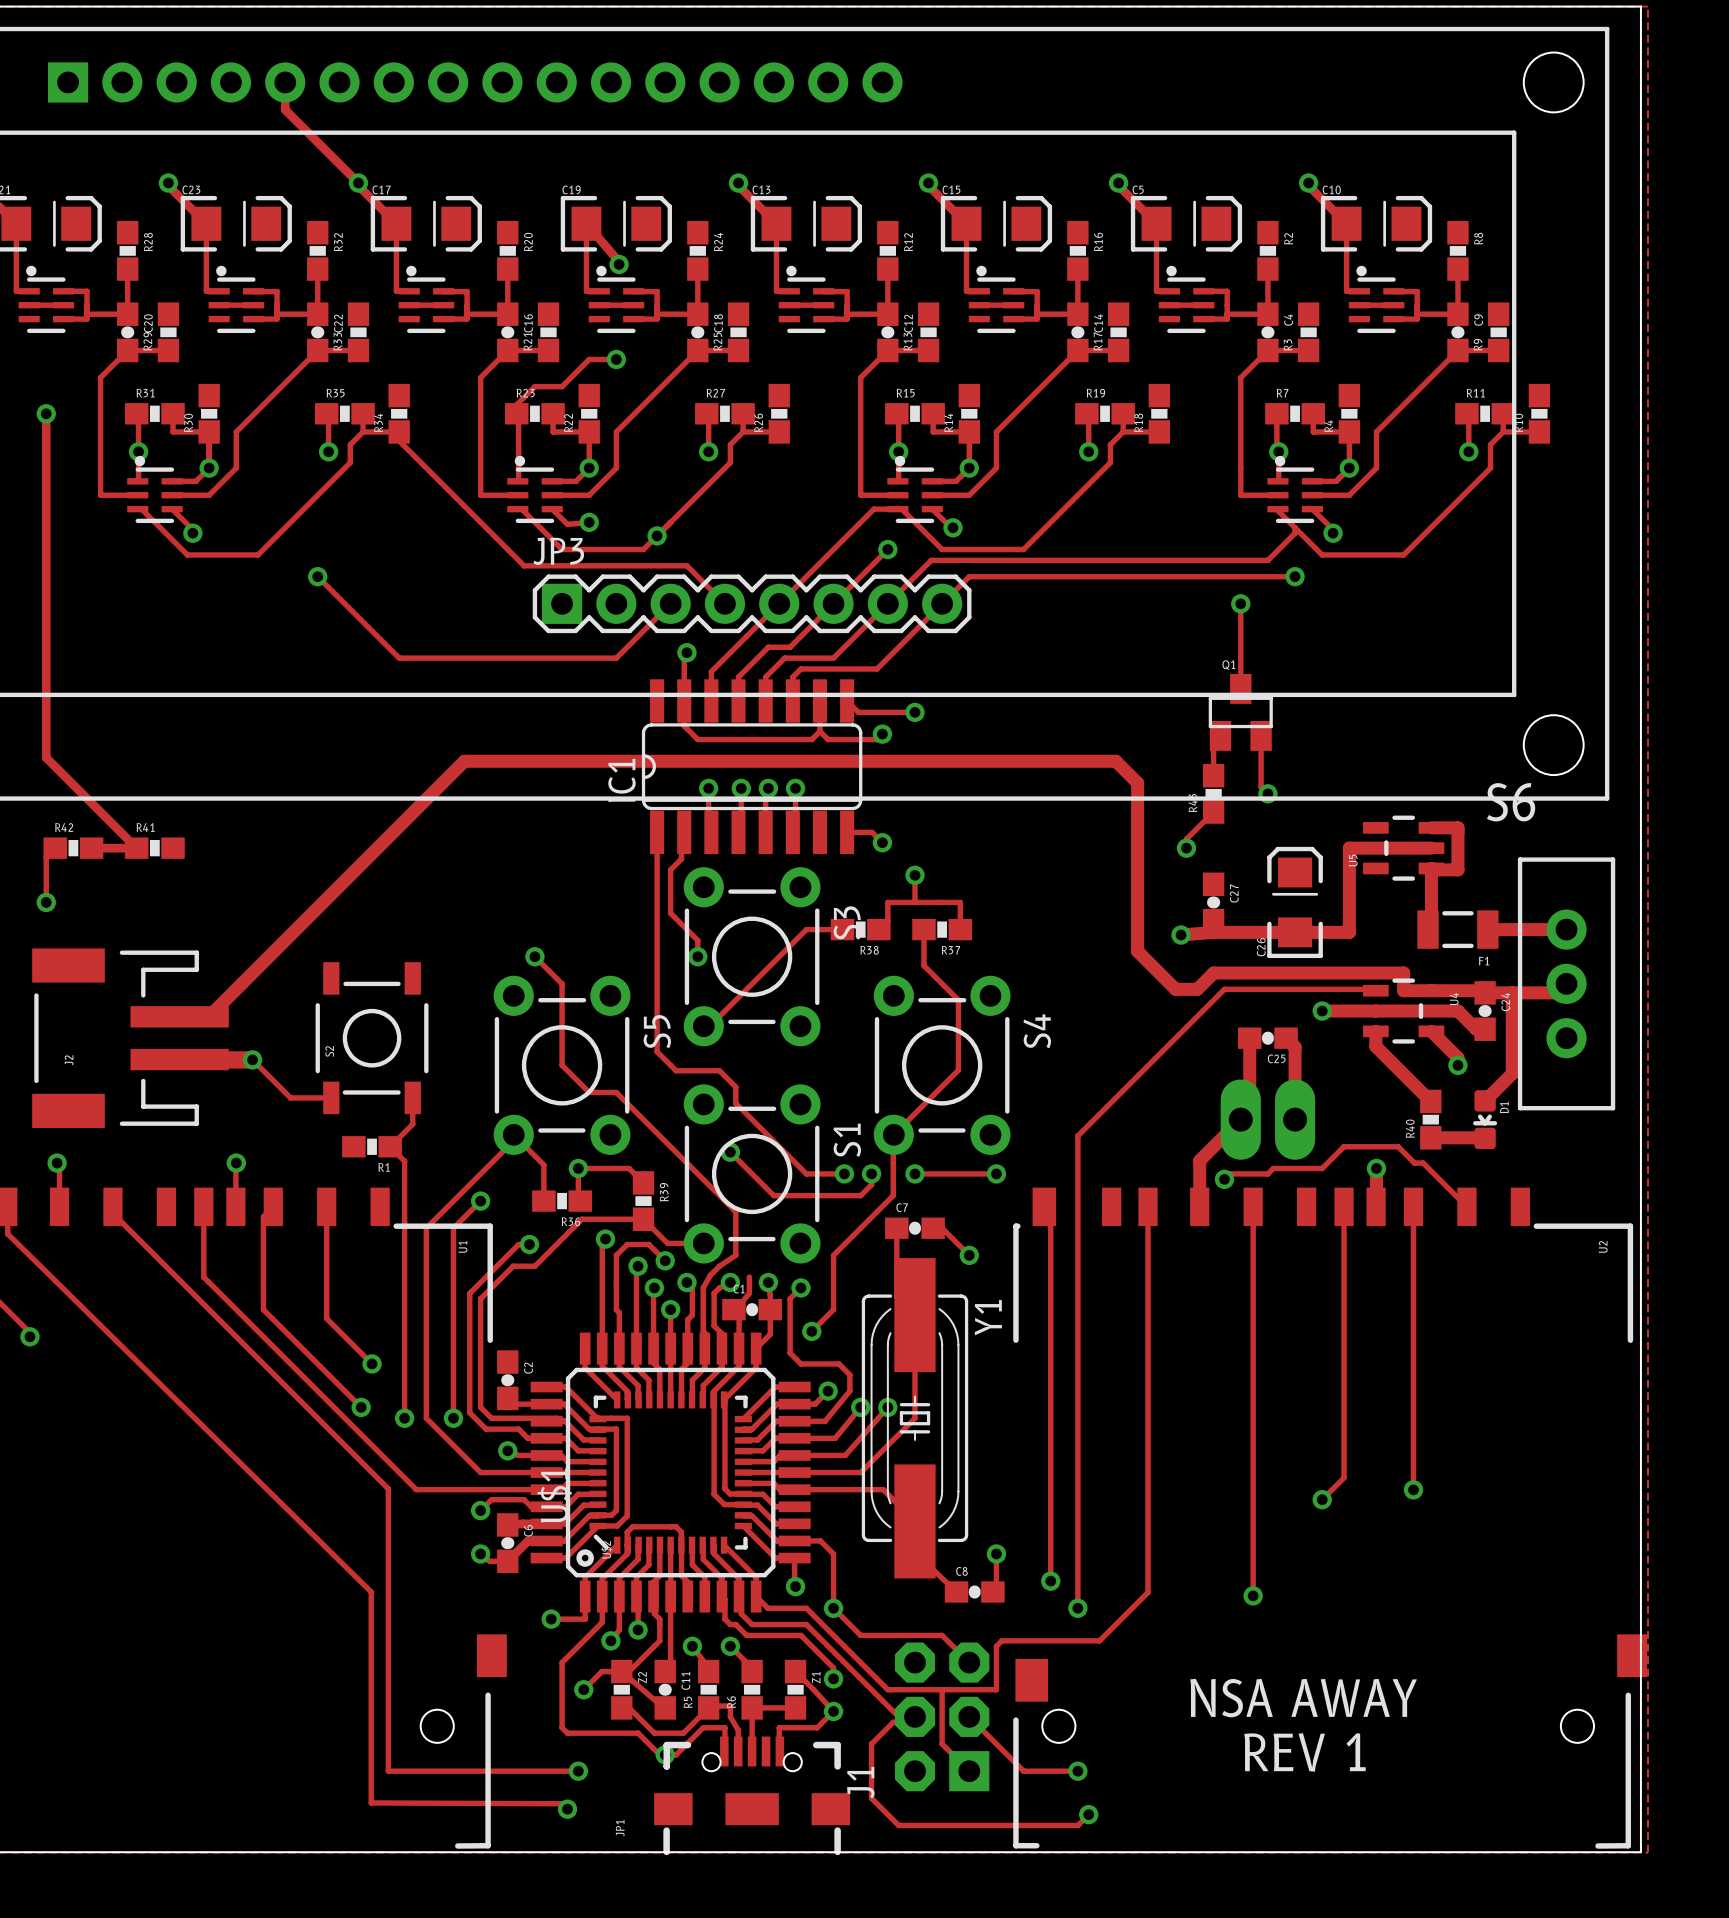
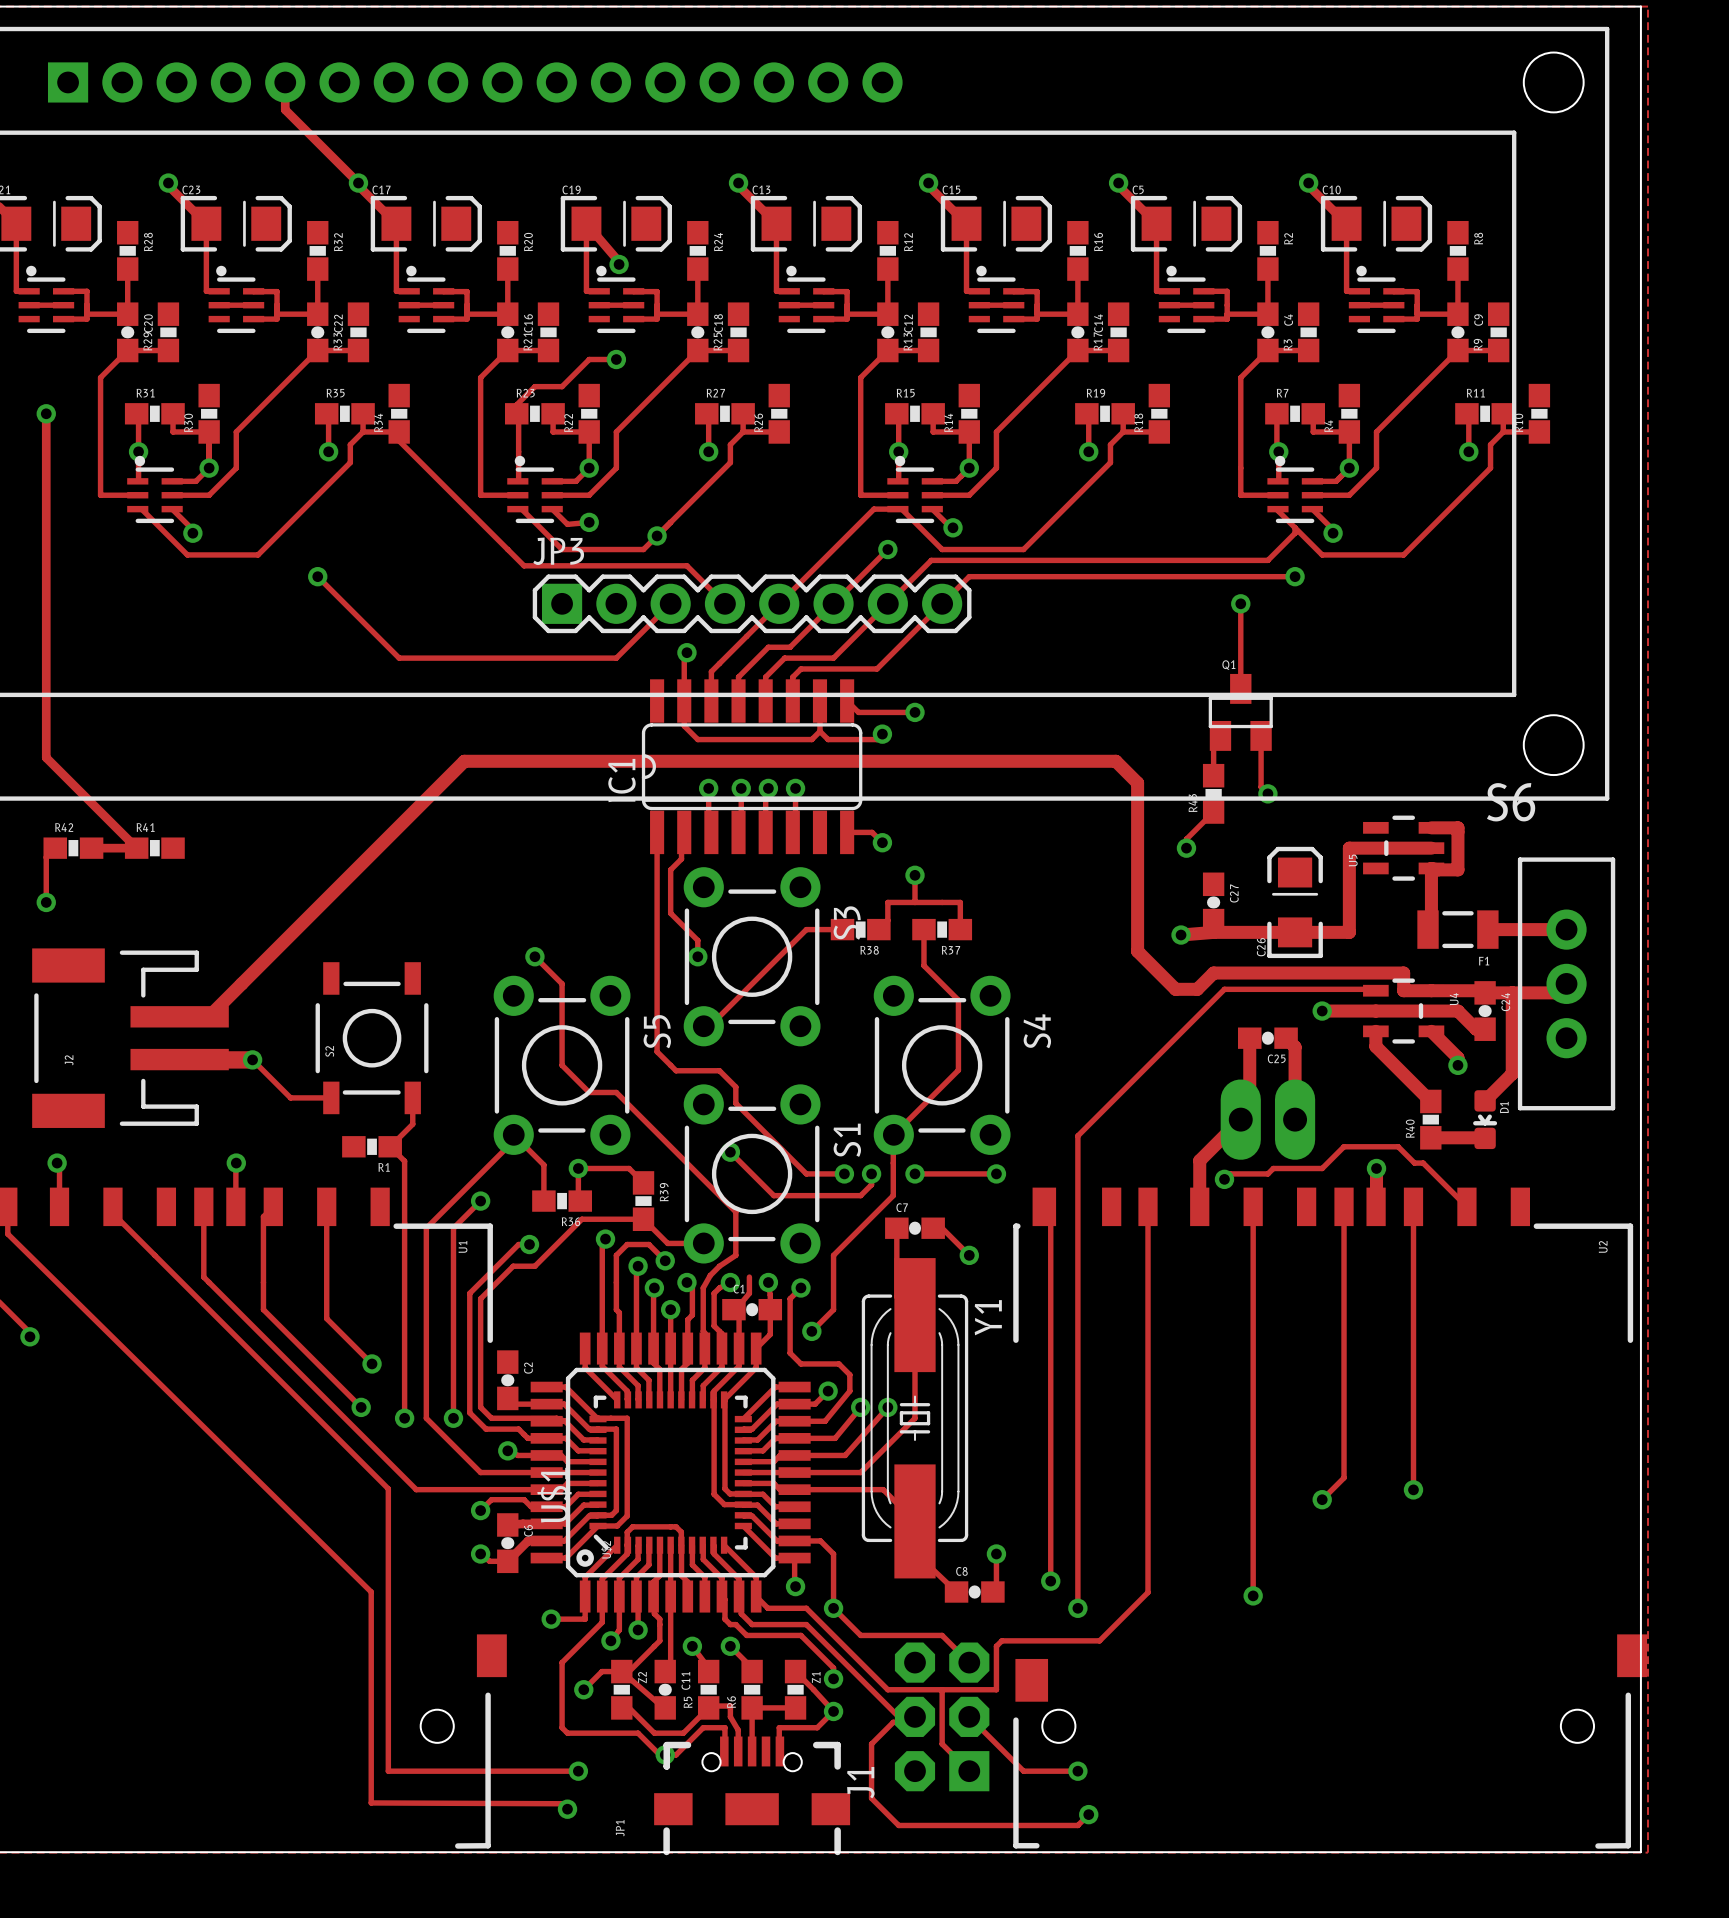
text: NSA AWAY (1303, 1698) -> none
text: REV 1 (1304, 1752) -> none

